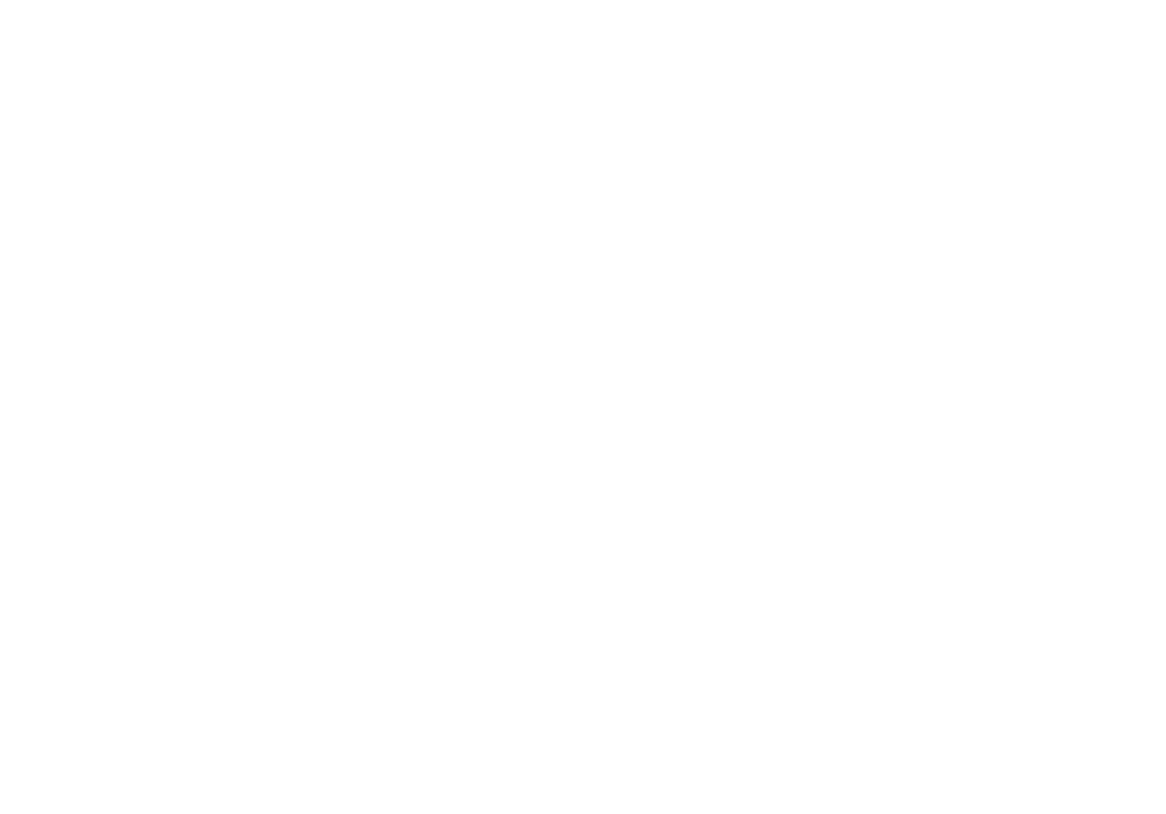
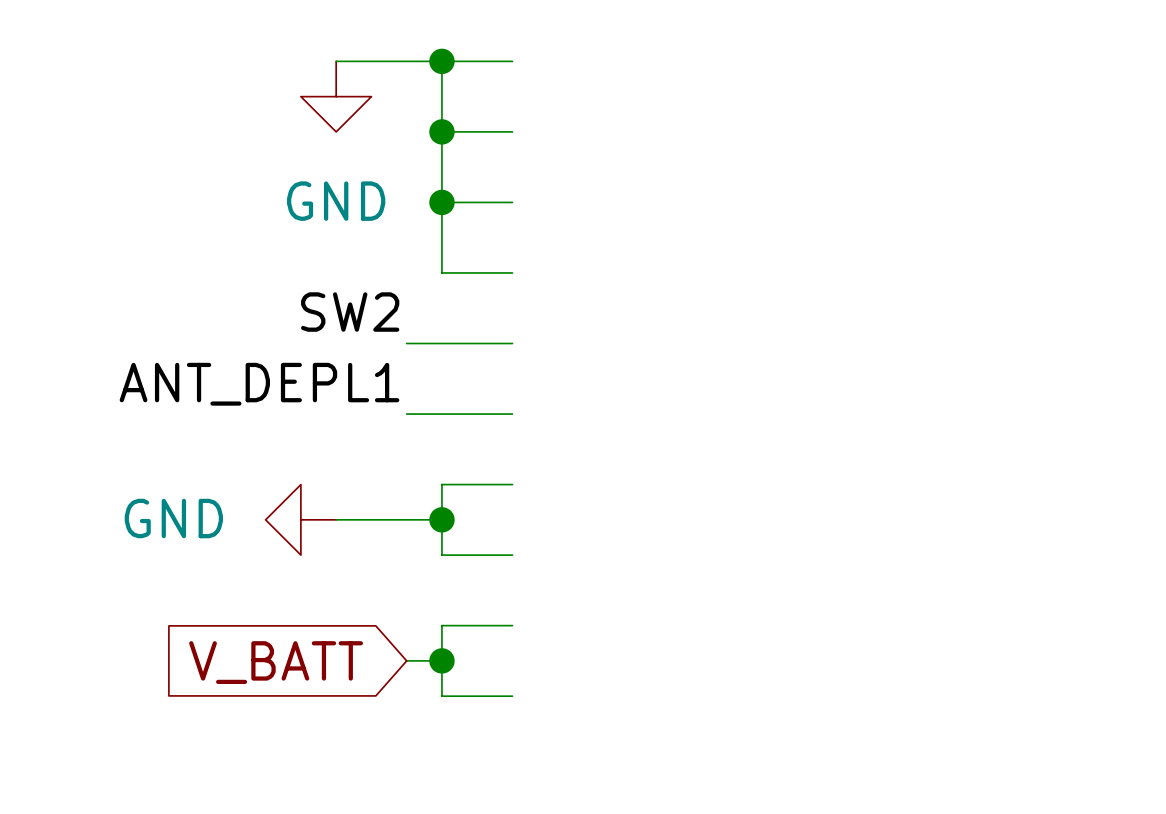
wire: none -> (336, 61) (512, 61)
wire: none -> (441, 61) (441, 272) (512, 272)
junction: none -> (441, 61)
power symbol: none -> GND (336, 96)
wire: none -> (441, 131) (512, 131)
junction: none -> (441, 131)
wire: none -> (441, 202) (512, 202)
junction: none -> (441, 202)
label: none -> SW2 (350, 312)
wire: none -> (406, 343) (512, 343)
label: none -> ANT_DEPL1 (259, 384)
wire: none -> (406, 414) (512, 414)
wire: none -> (512, 484) (441, 484) (441, 555) (512, 555)
power symbol: none -> GND (300, 519)
wire: none -> (336, 519) (441, 519)
junction: none -> (441, 519)
wire: none -> (512, 625) (441, 625) (441, 696) (512, 696)
wire: none -> (406, 660) (441, 660)
junction: none -> (441, 660)
global label: none -> V_BATT (276, 662)

